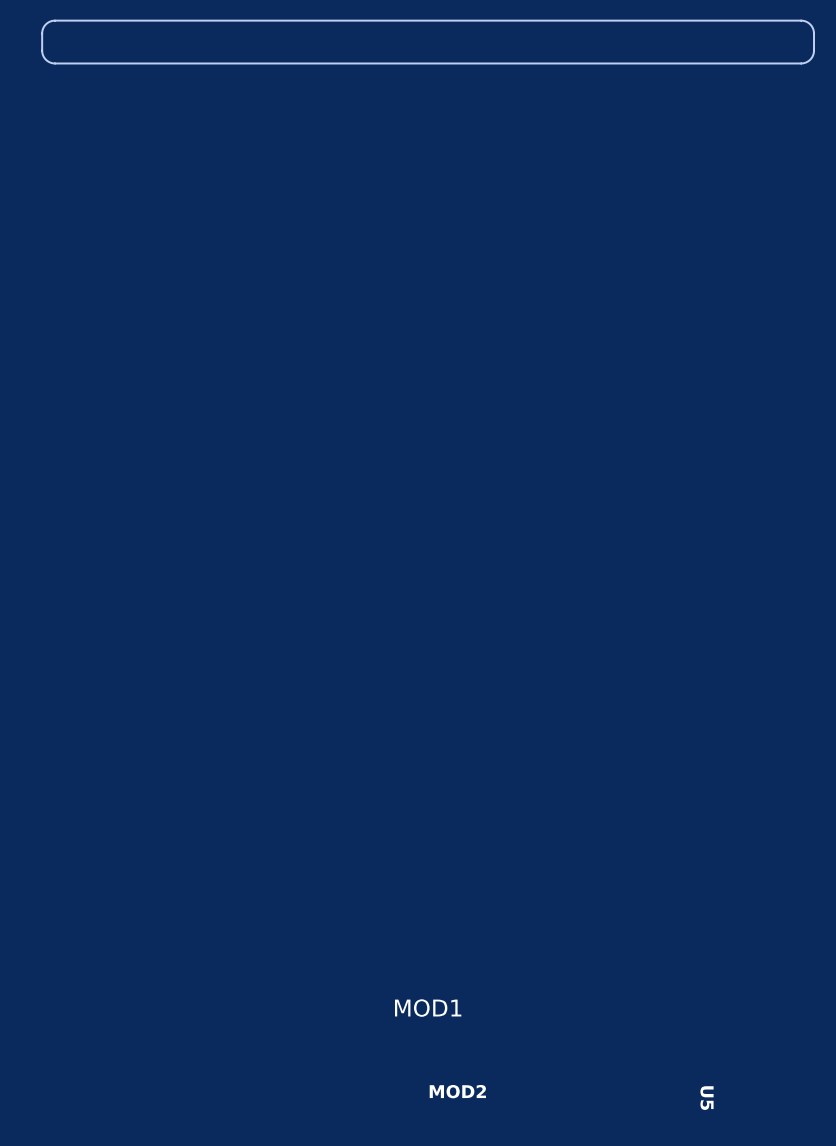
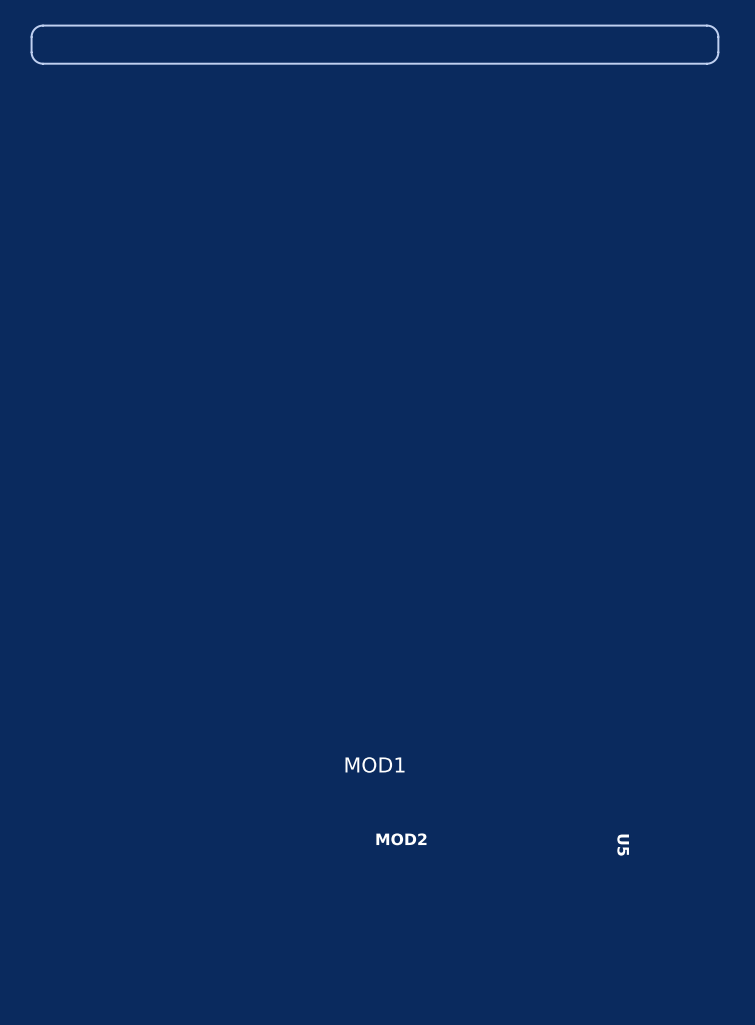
MOD1 position: (428, 1008) -> (375, 764)
MOD2 position: (457, 1091) -> (401, 839)
U5 position: (707, 1098) -> (623, 845)

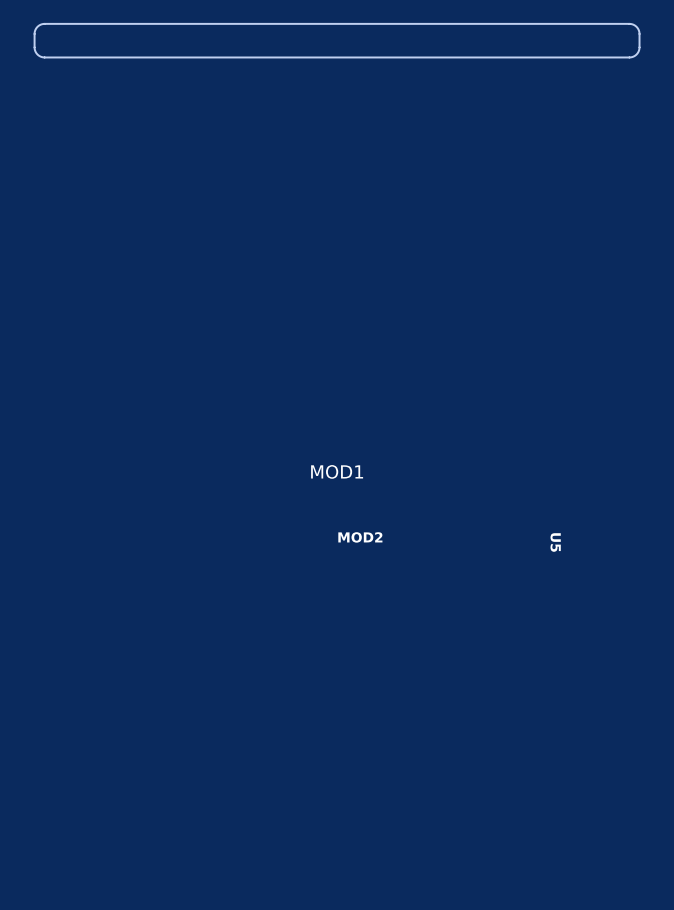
MOD1 position: (375, 764) -> (337, 471)
MOD2 position: (401, 839) -> (360, 537)
U5 position: (623, 845) -> (555, 542)

